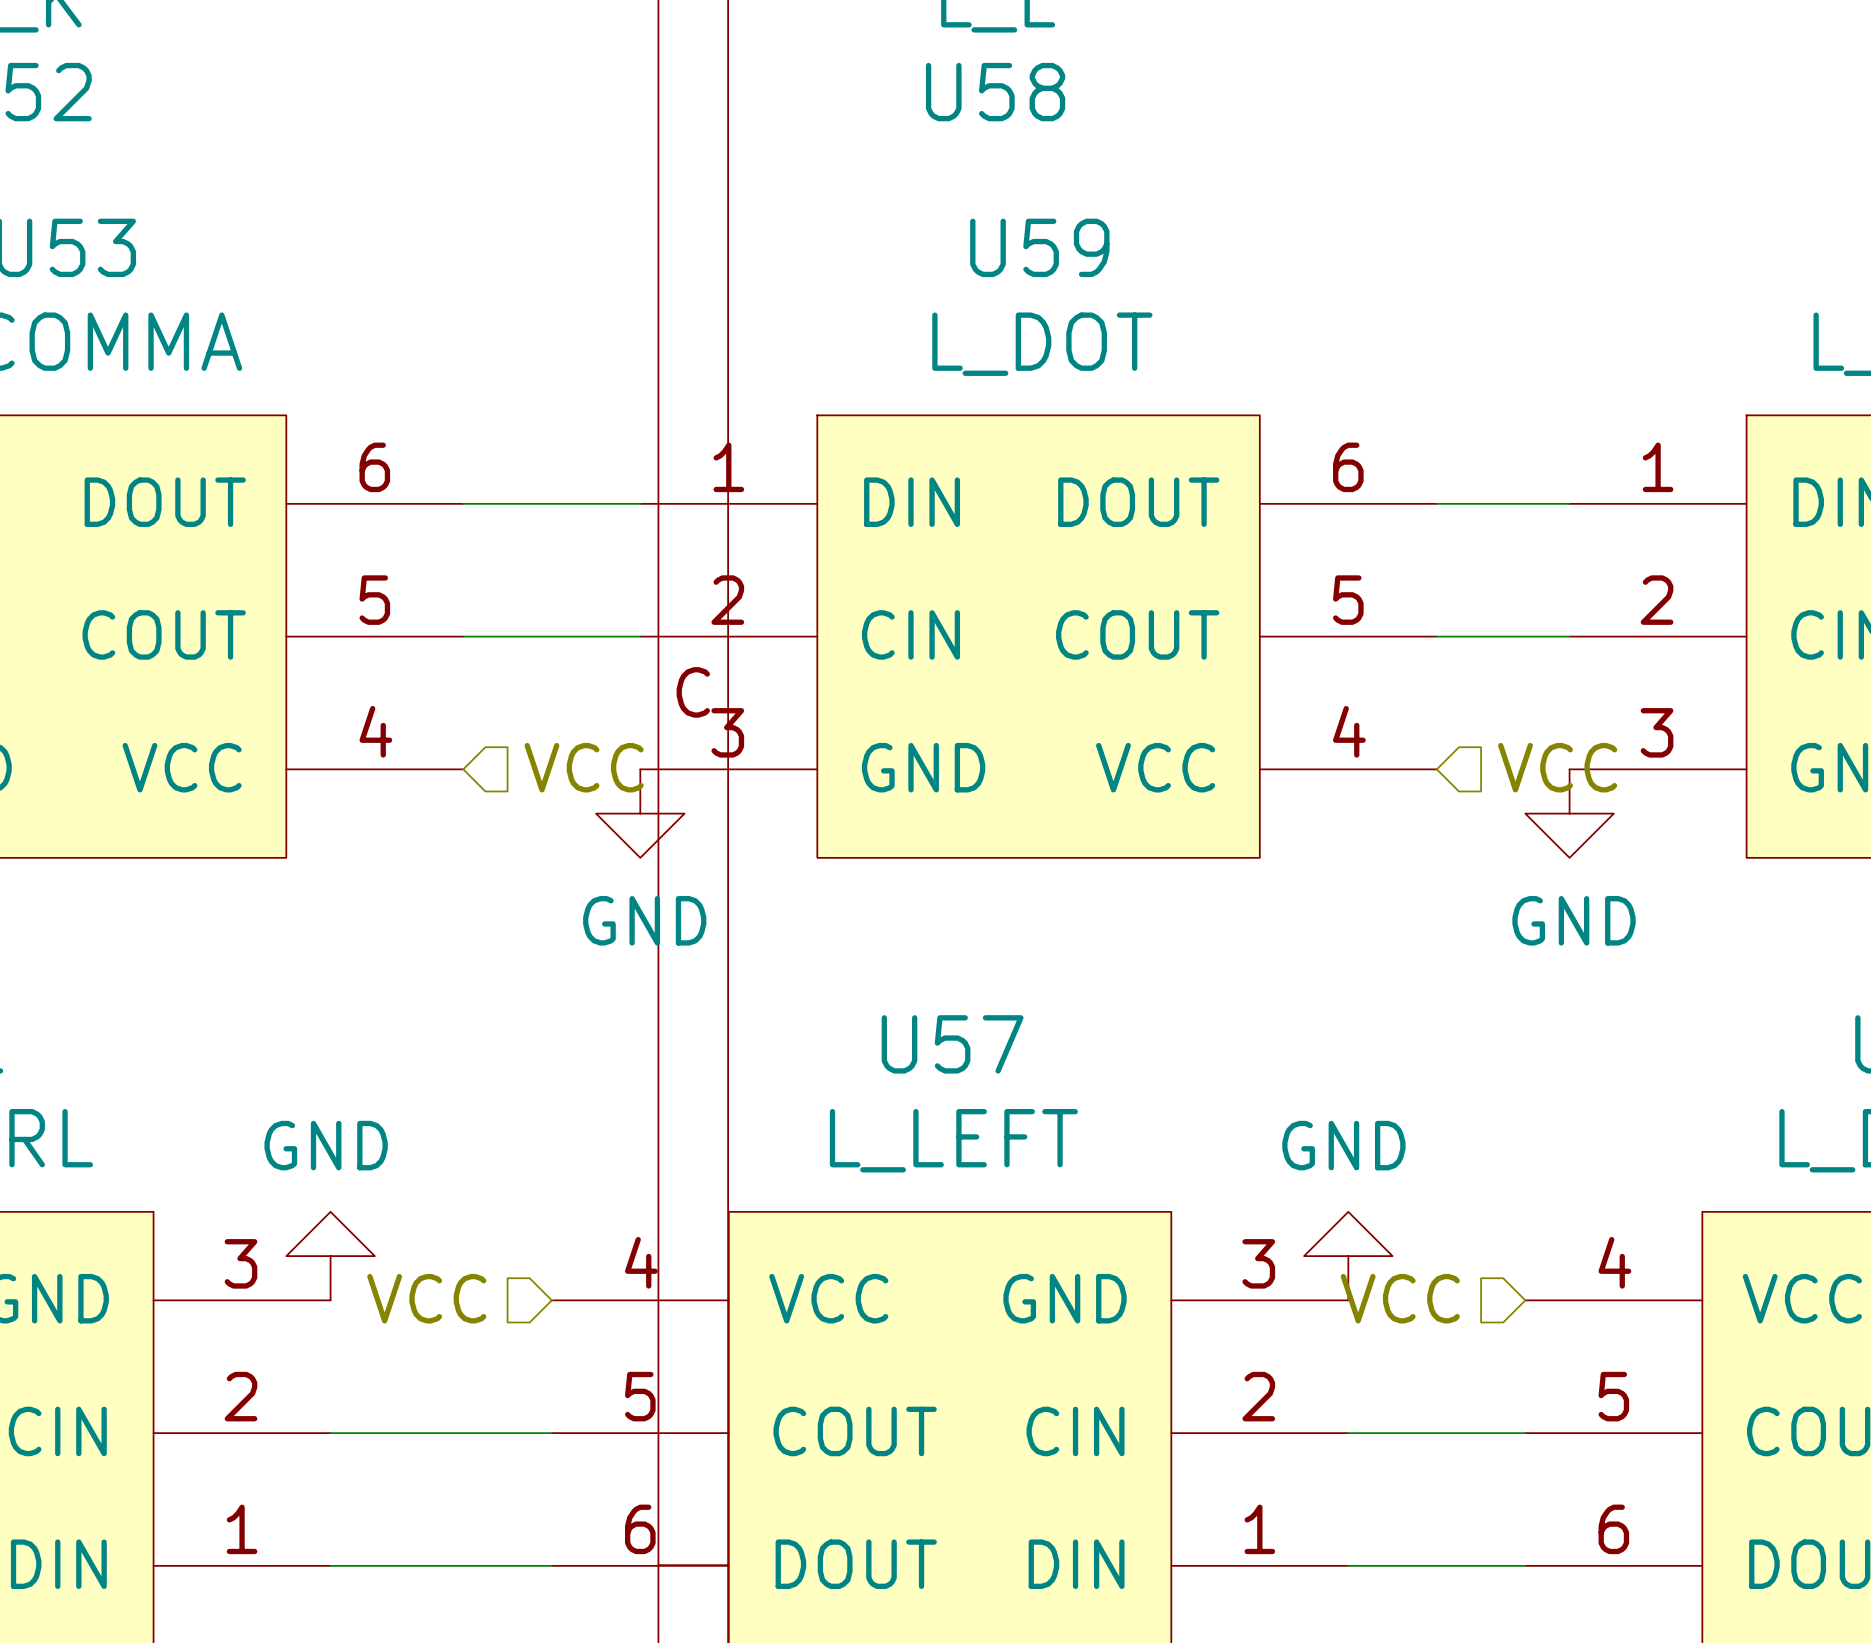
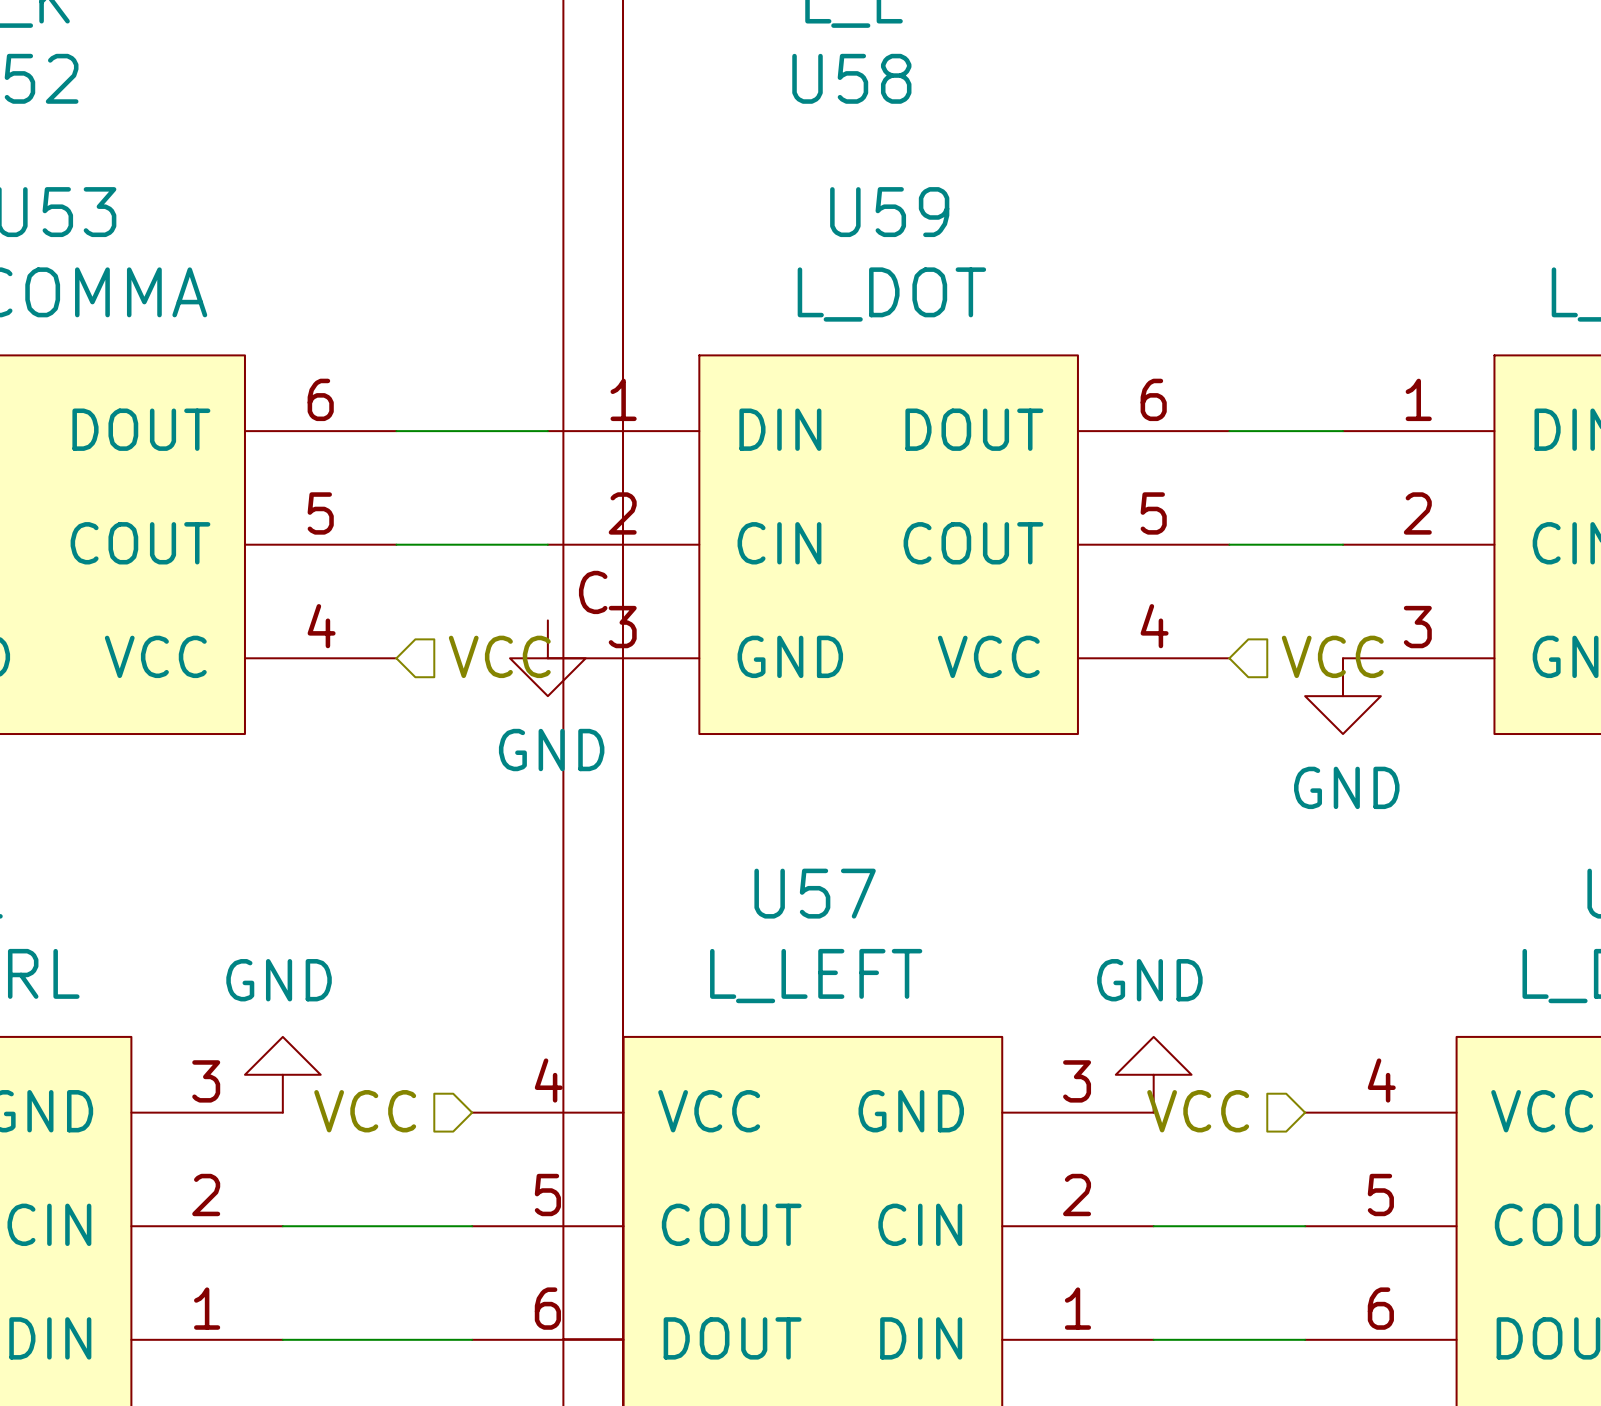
power symbol position: GND (640, 813) -> GND (547, 658)

